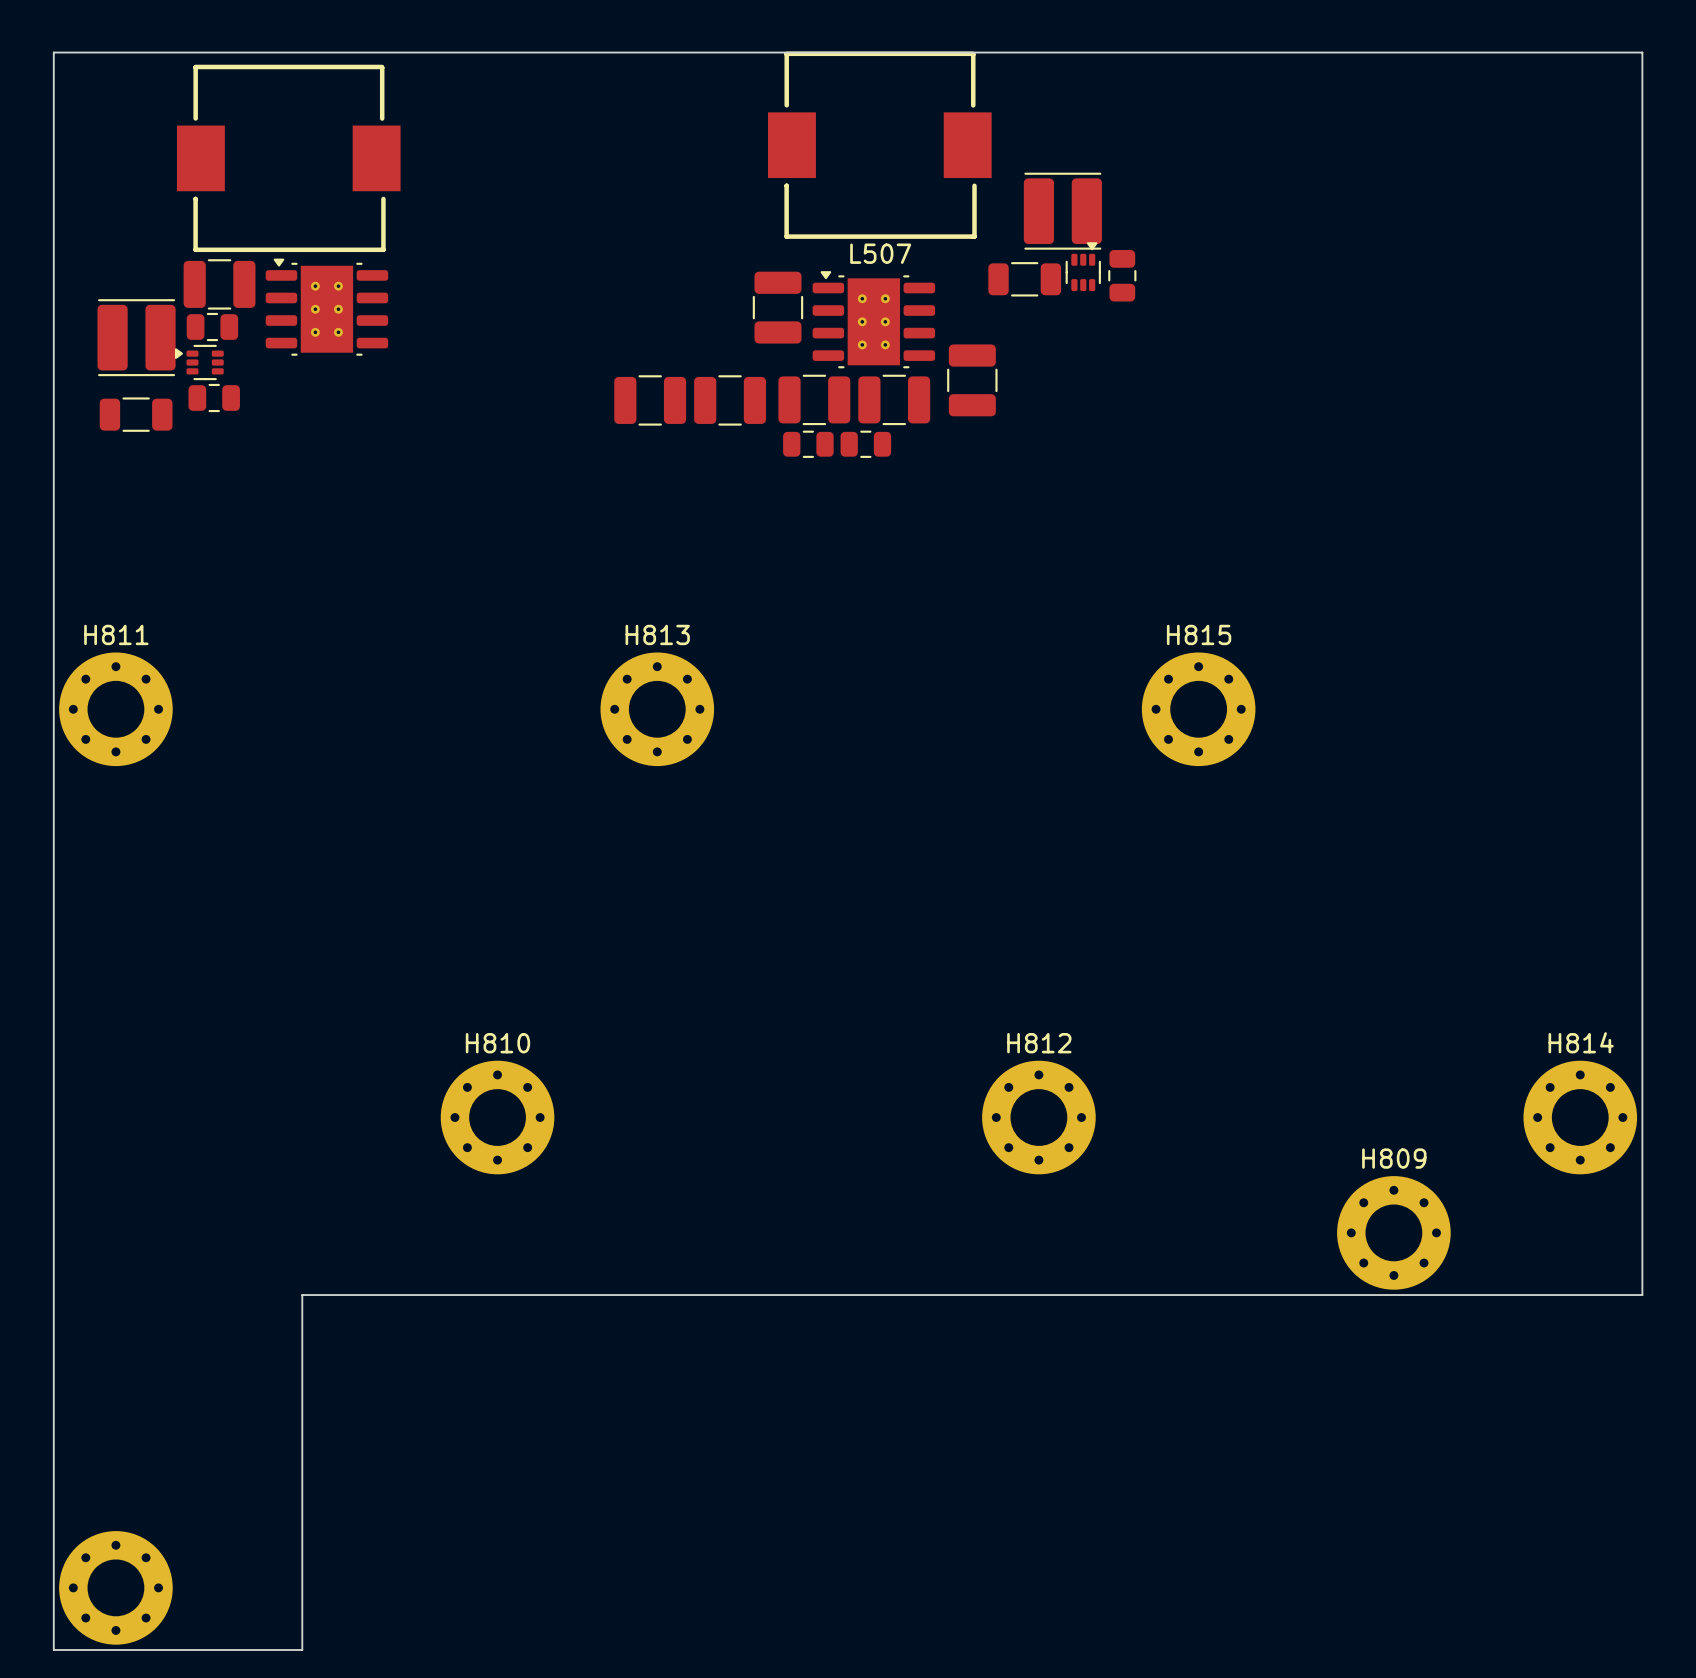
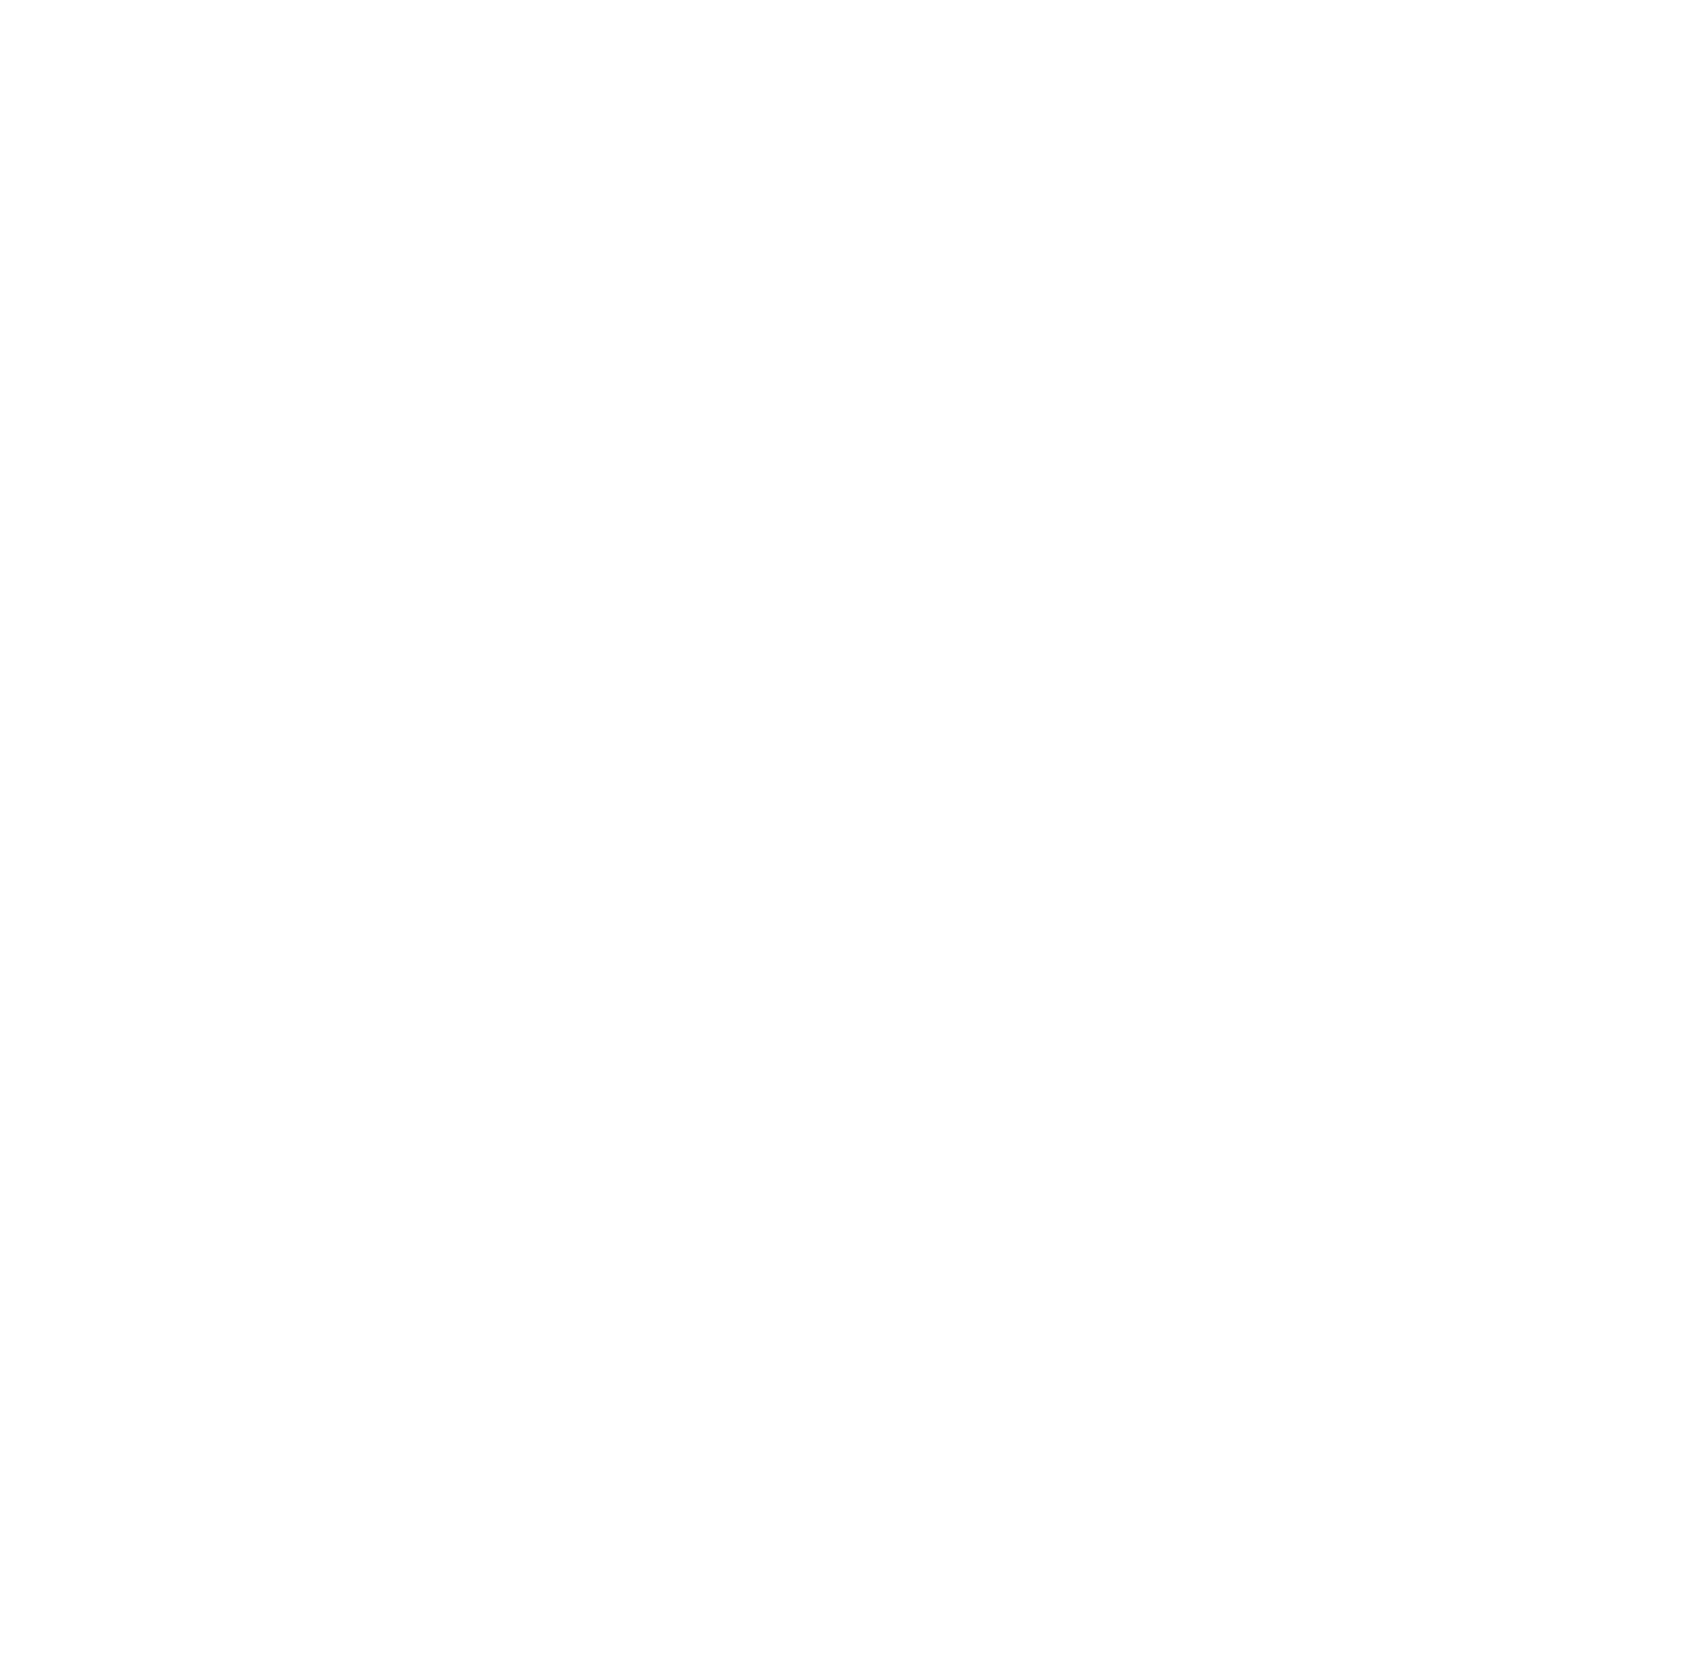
board edge: (53, 52) (53, 1650) (302, 1650) (302, 1295) (1642, 1295) (1642, 52) (53, 52) -> none
L507: (879, 145) -> none
part: (288, 158) -> none
part: (1062, 211) -> none
part: (1083, 266) -> none
part: (1122, 275) -> none
part: (1024, 279) -> none
part: (219, 284) -> none
part: (326, 307) -> none
part: (777, 307) -> none
part: (873, 319) -> none
part: (212, 327) -> none
part: (136, 337) -> none
part: (199, 362) -> none
part: (972, 380) -> none
part: (214, 398) -> none
part: (814, 399) -> none
part: (894, 399) -> none
part: (650, 400) -> none
part: (730, 400) -> none
part: (136, 414) -> none
part: (808, 444) -> none
part: (865, 444) -> none
H811: (115, 709) -> none
H813: (657, 709) -> none
H815: (1198, 709) -> none
H810: (497, 1117) -> none
H812: (1038, 1117) -> none
H814: (1580, 1117) -> none
H809: (1393, 1232) -> none
part: (115, 1587) -> none

